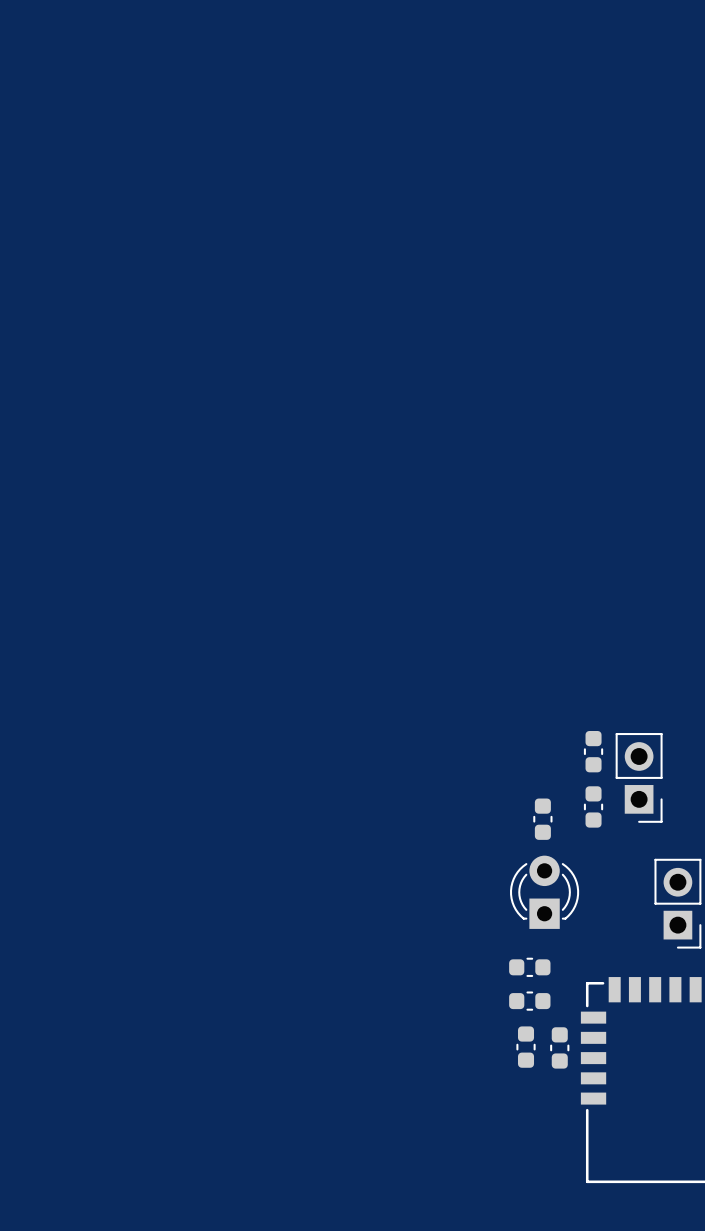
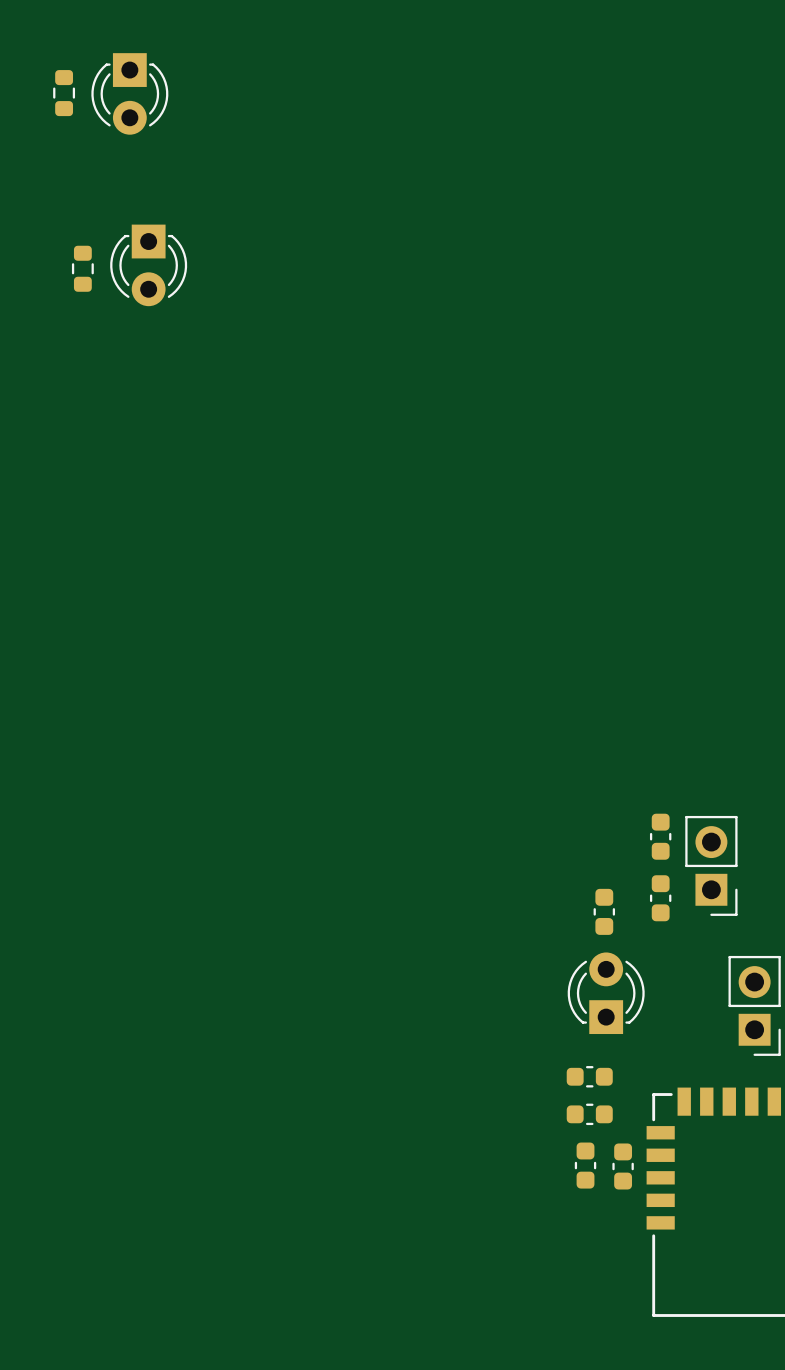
part: none -> (64, 93)
part: none -> (129, 93)
part: none -> (148, 265)
part: none -> (82, 268)

